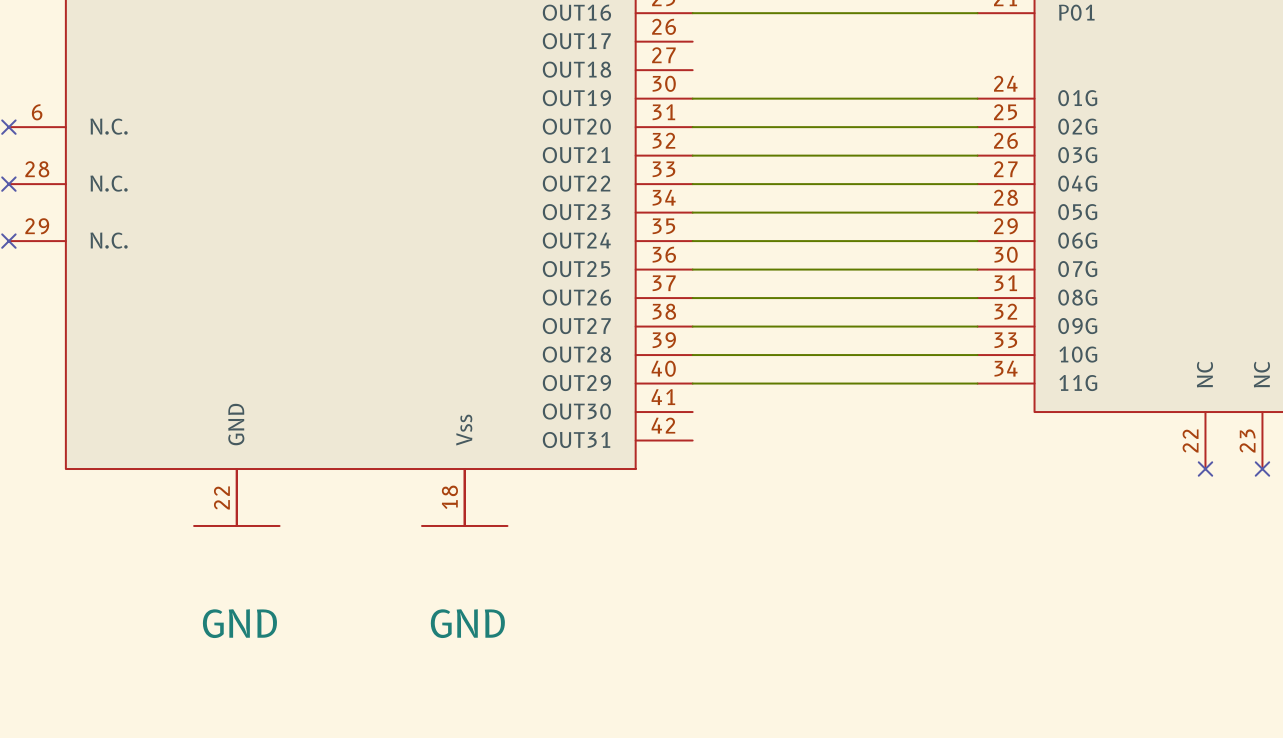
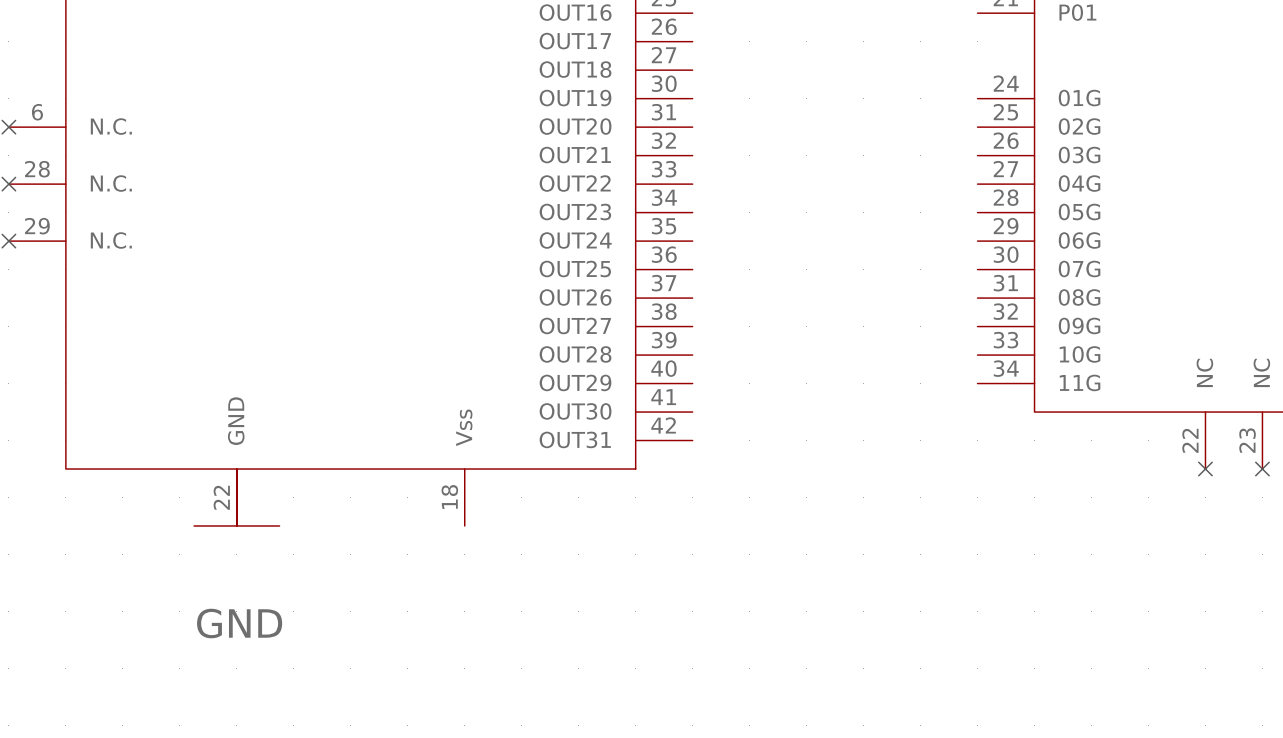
wire: (692, 13) (977, 13) -> none
wire: (692, 98) (977, 98) -> none
wire: (692, 127) (977, 127) -> none
wire: (692, 155) (977, 155) -> none
wire: (692, 184) (977, 184) -> none
wire: (692, 212) (977, 212) -> none
wire: (692, 241) (977, 241) -> none
wire: (692, 269) (977, 269) -> none
wire: (692, 298) (977, 298) -> none
wire: (692, 326) (977, 326) -> none
wire: (692, 355) (977, 355) -> none
wire: (692, 383) (977, 383) -> none
power symbol: GND (464, 497) -> none

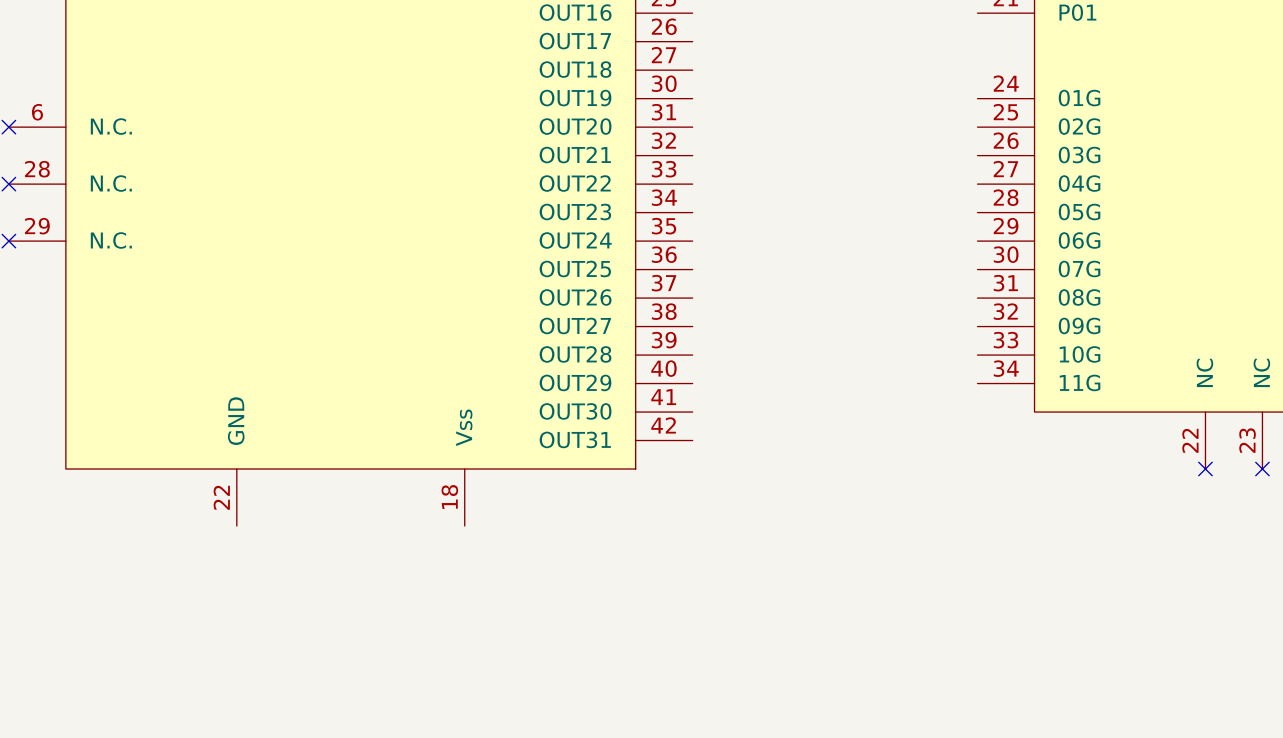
power symbol: GND (236, 497) -> none

